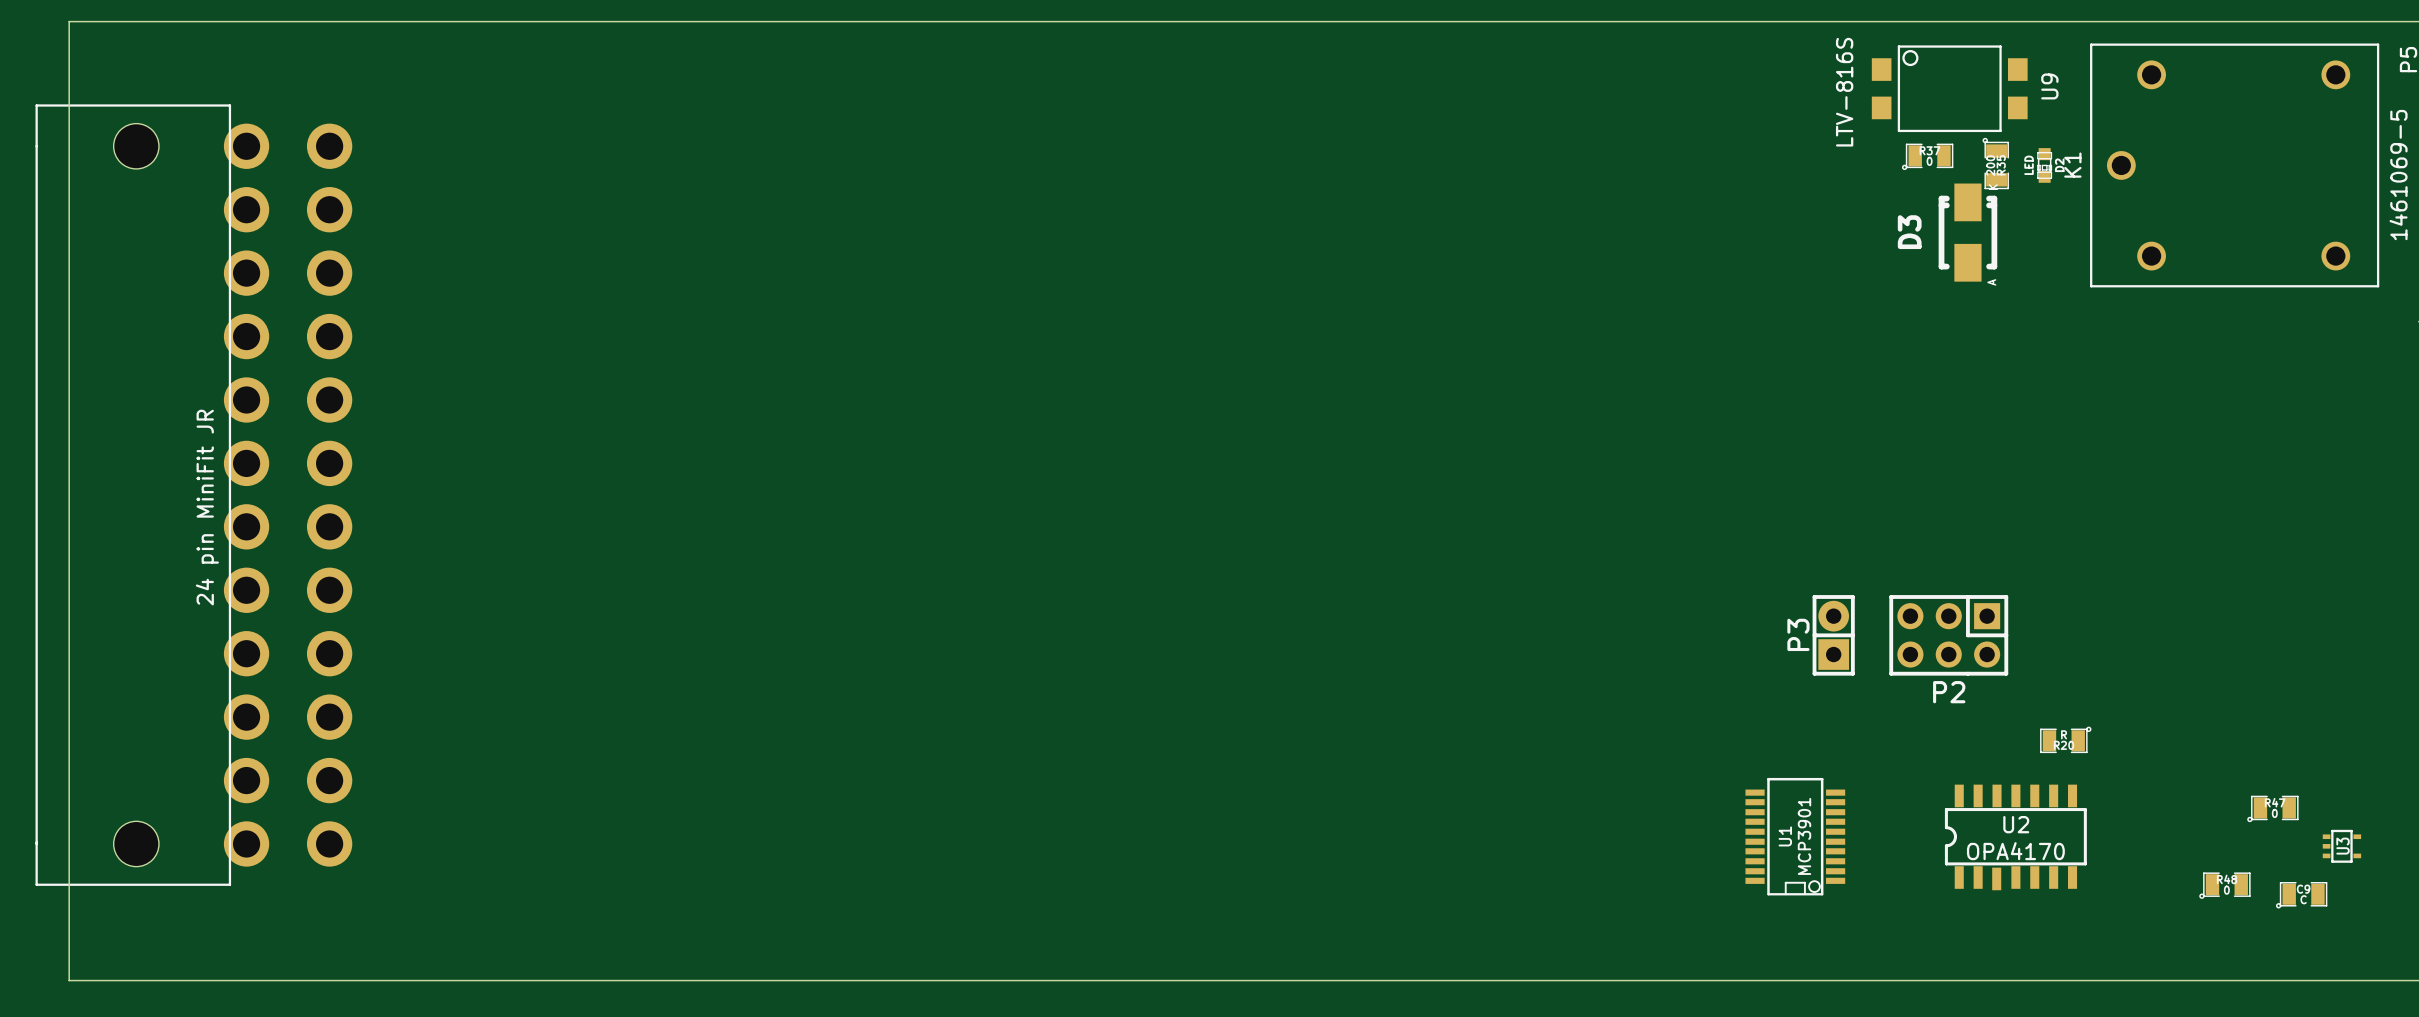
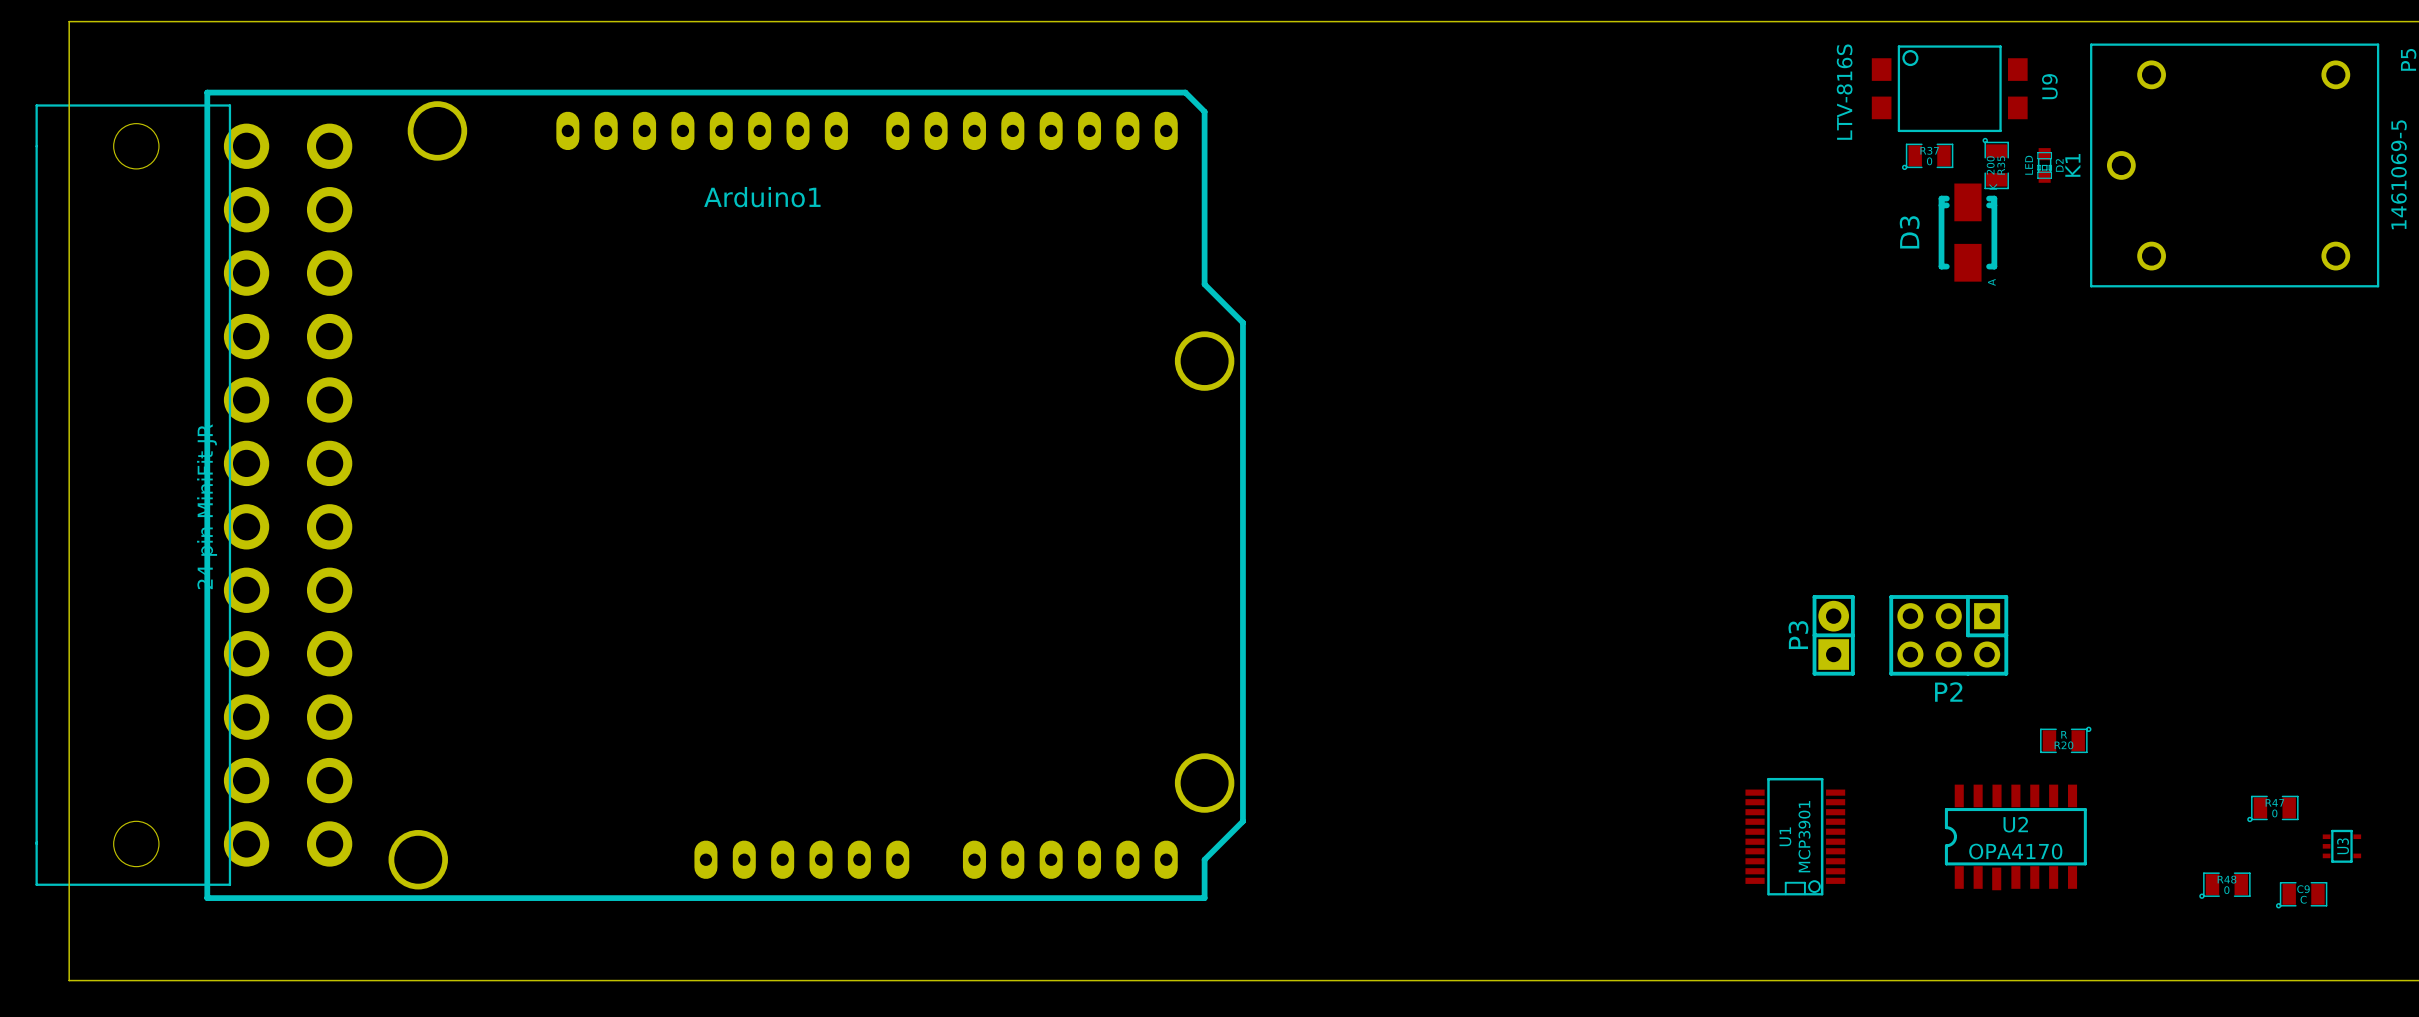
Arduino1: none -> (725, 495)

